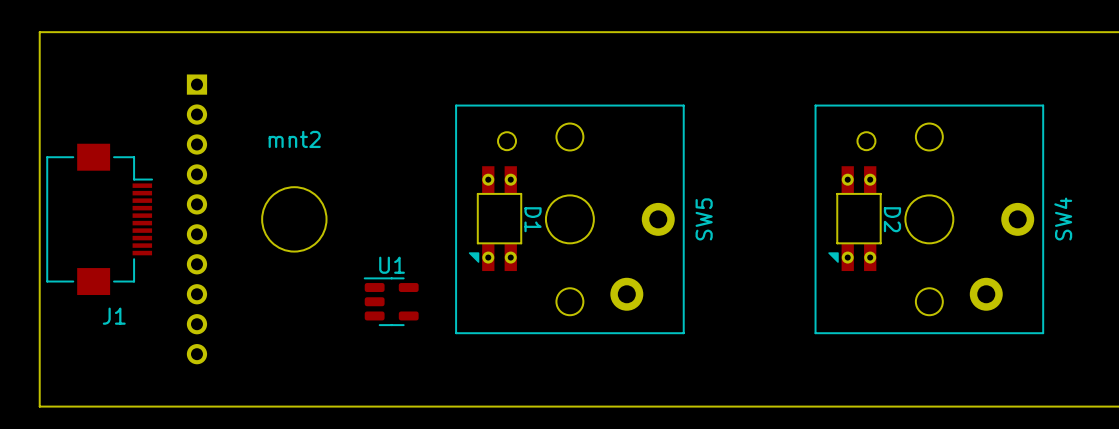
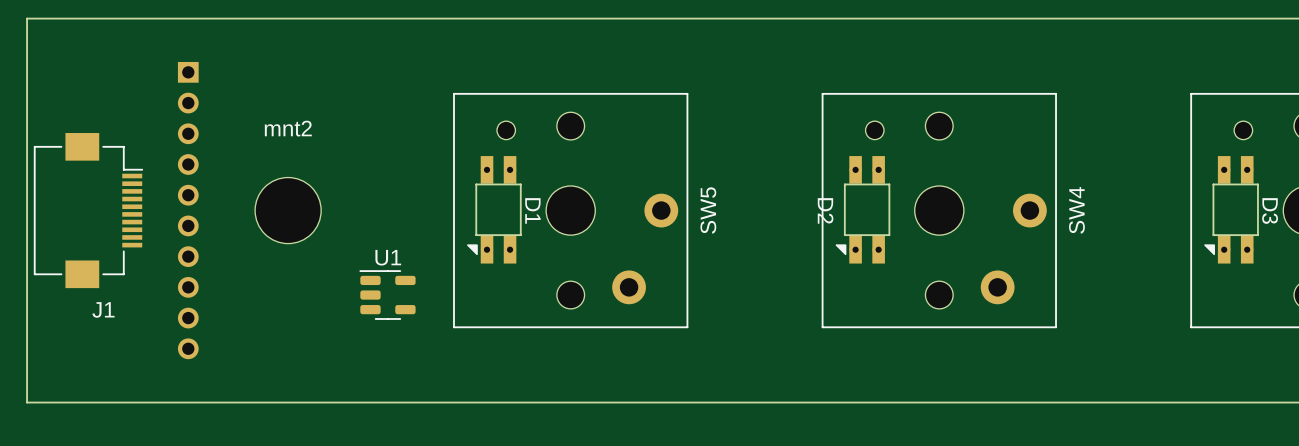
D2 name position: D2 (892, 219) -> D2 (825, 210)

